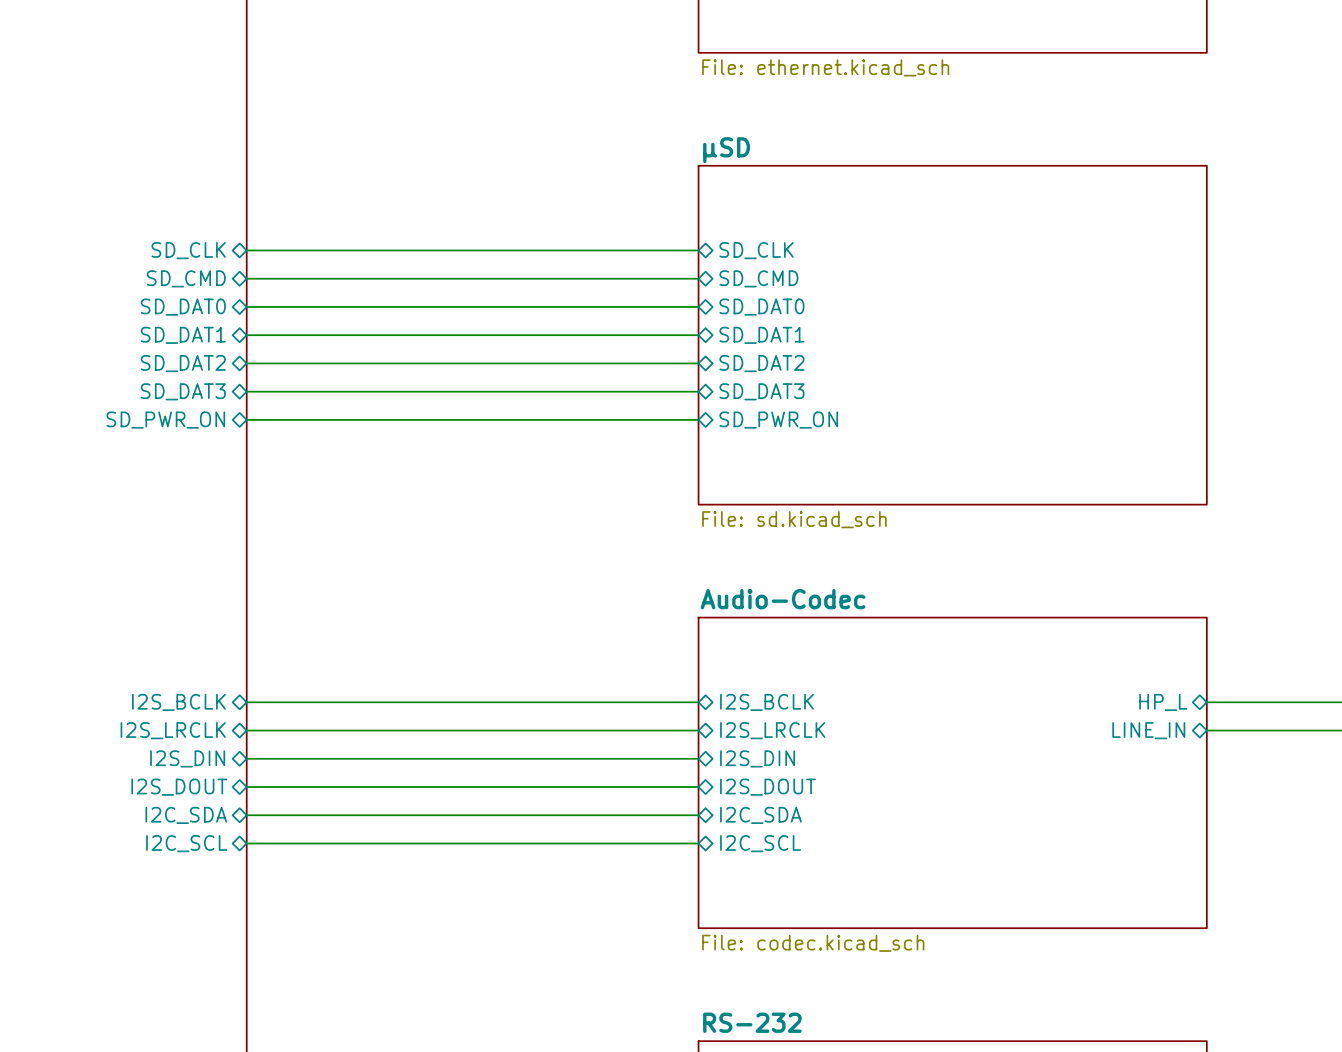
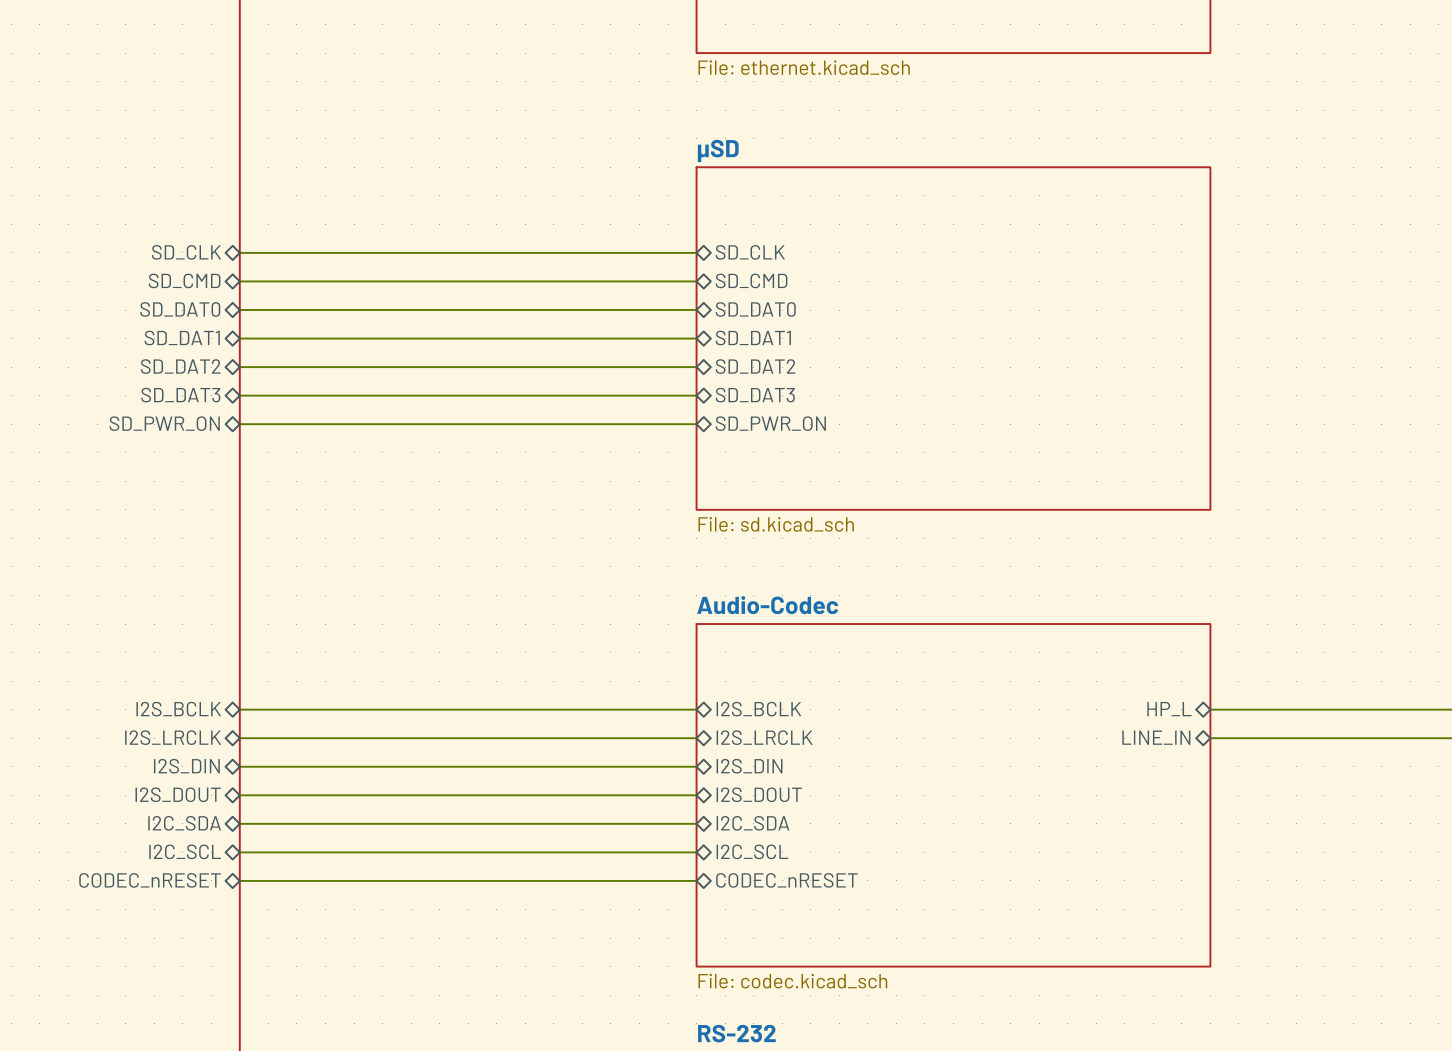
sheet Audio-Codec: File: codec.kicad_sch (952, 772) -> none
sheet Audio-Codec: none -> File: codec.kicad_sch (953, 795)
sheet pin: none -> CODEC_nRESET (150, 880)
wire: none -> (239, 880) (696, 880)
sheet pin: none -> CODEC_nRESET (786, 880)

